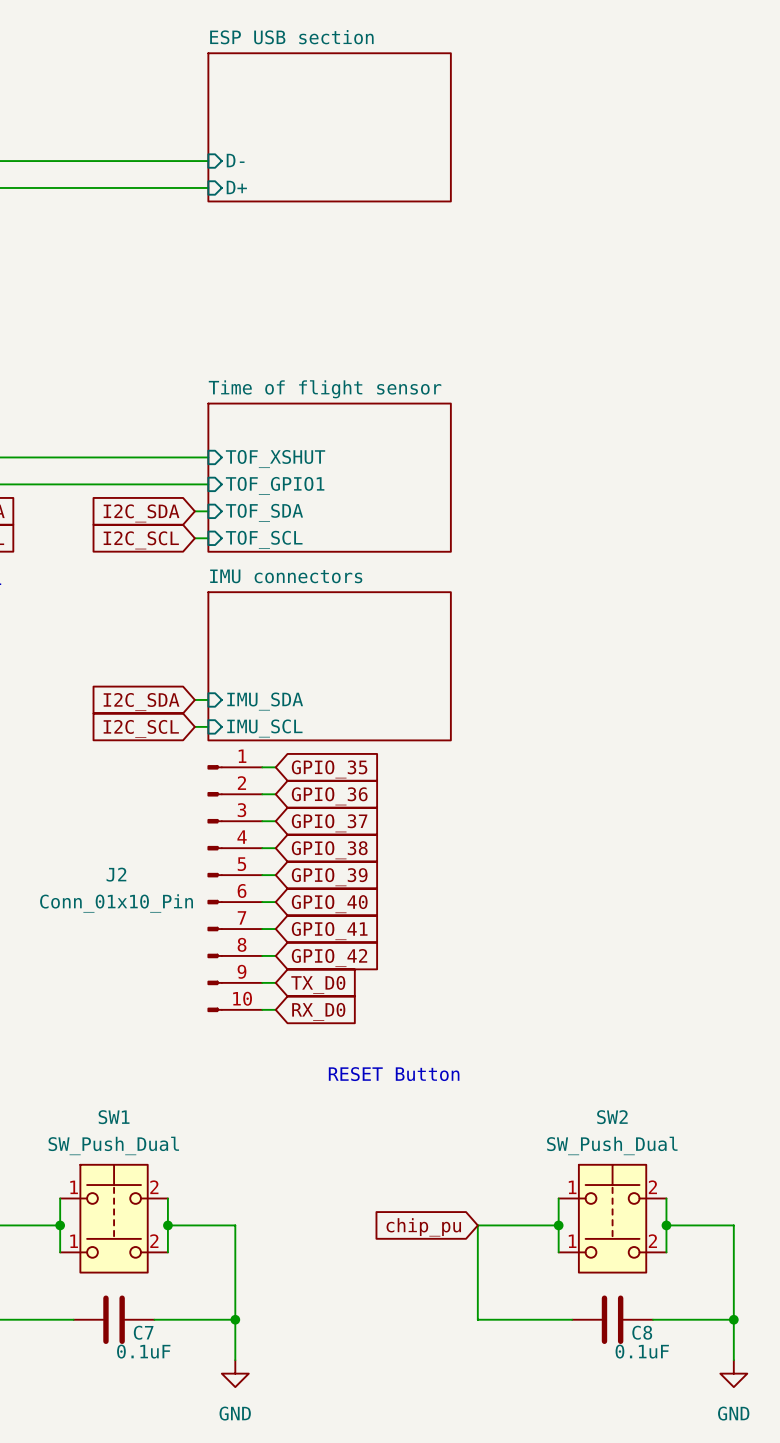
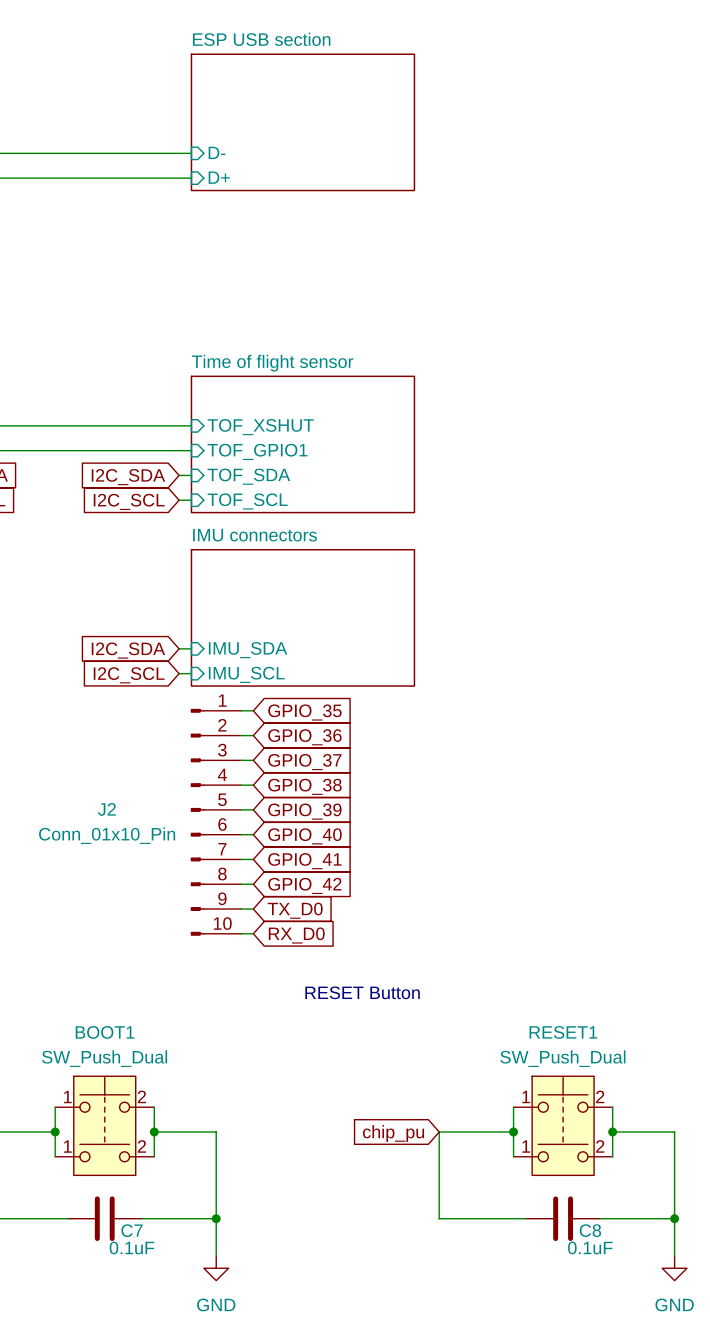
SW1 name: SW1 (114, 1117) -> BOOT1 (105, 1032)
SW2 name: SW2 (612, 1117) -> RESET1 (563, 1032)

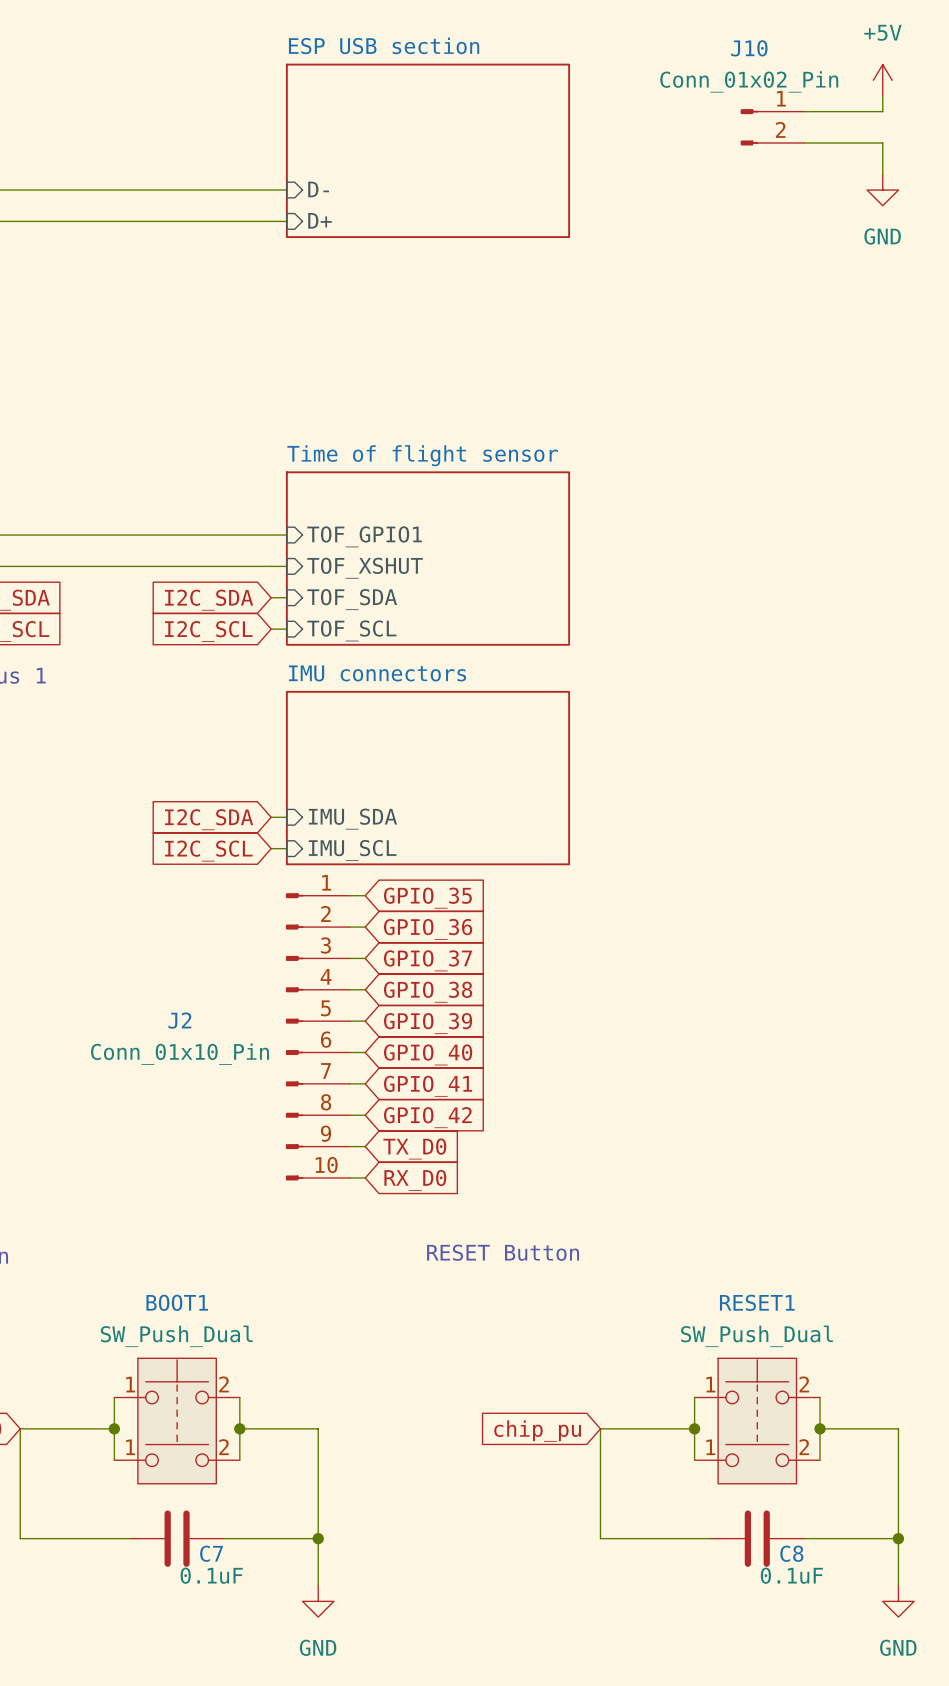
power symbol: none -> +5V (882, 80)
wire: none -> (882, 95) (882, 111) (804, 111)
J10: none -> Conn_01x02_Pin (772, 127)
wire: none -> (804, 142) (882, 142) (882, 174)
power symbol: none -> GND (882, 190)
sheet pin: TOF_XSHUT (260, 427) -> TOF_GPIO1 (364, 536)
sheet pin: TOF_GPIO1 (257, 451) -> TOF_XSHUT (365, 568)

